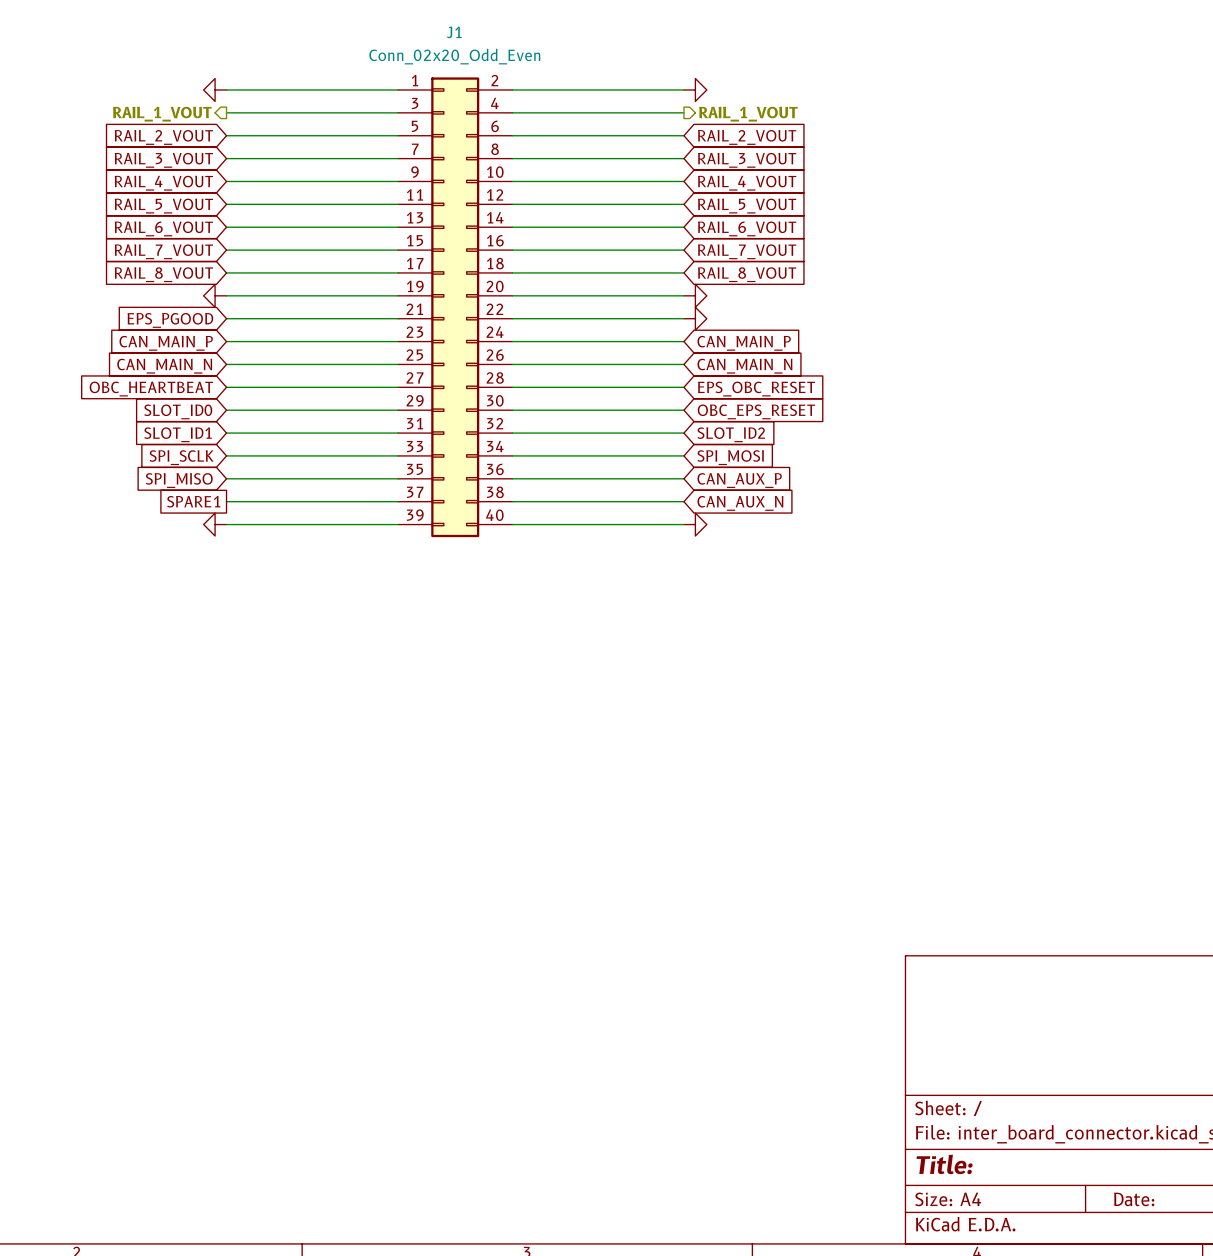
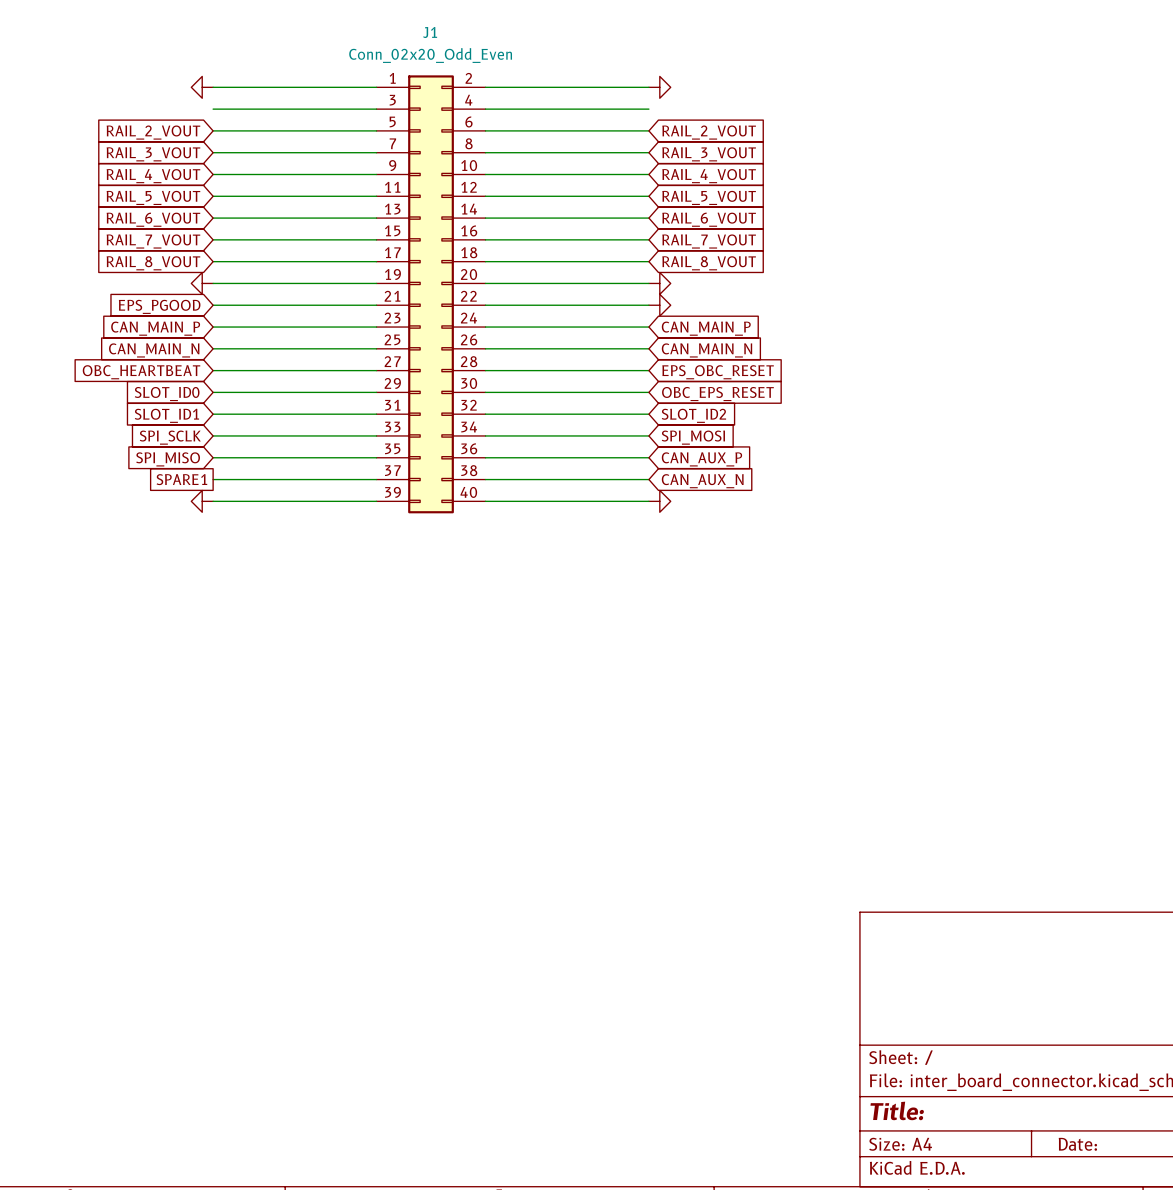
hierarchical label: RAIL_1_VOUT (162, 114) -> none
hierarchical label: RAIL_1_VOUT (748, 114) -> none

